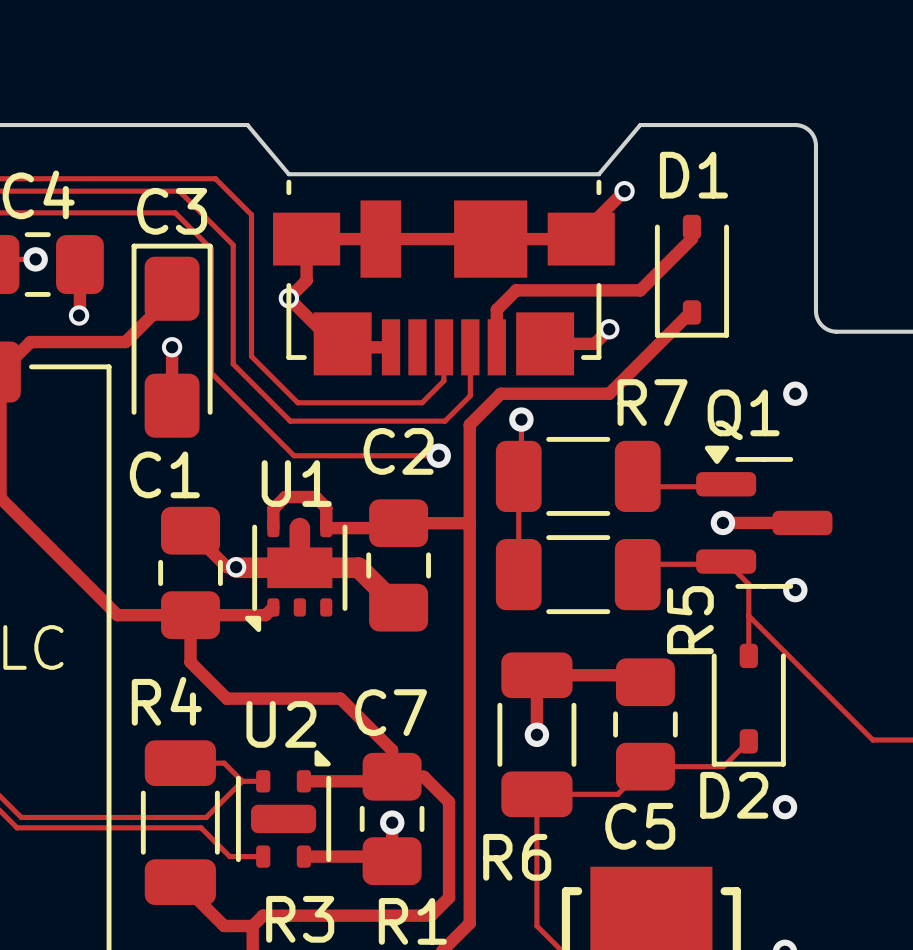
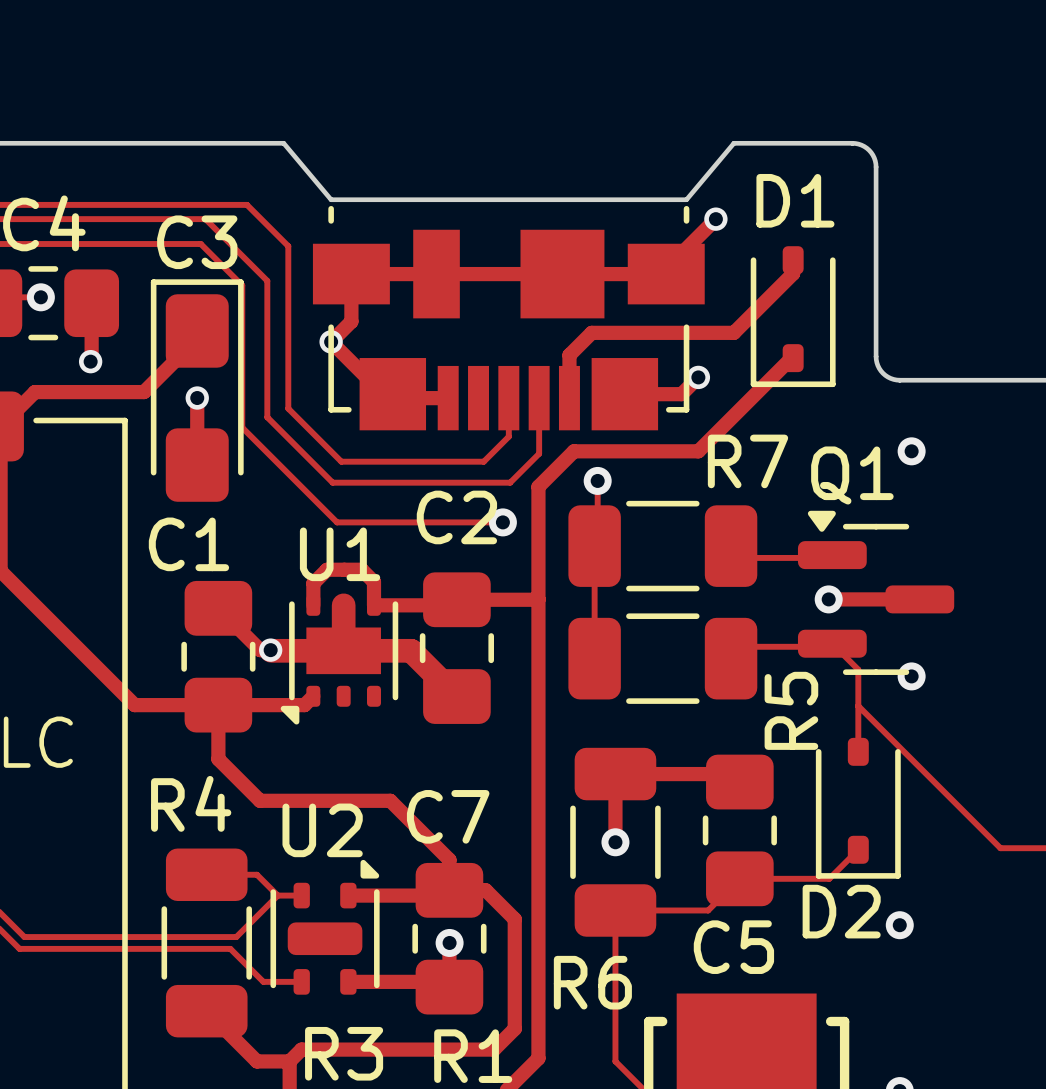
board edge: (743, 125) (798, 125) (807, 129) (814, 137) (816, 313) (818, 321) (824, 327) (836, 331) -> (852, 143) (861, 145) (869, 150) (875, 163) (876, 356) (877, 365) (885, 375) (896, 380) (959, 380)

